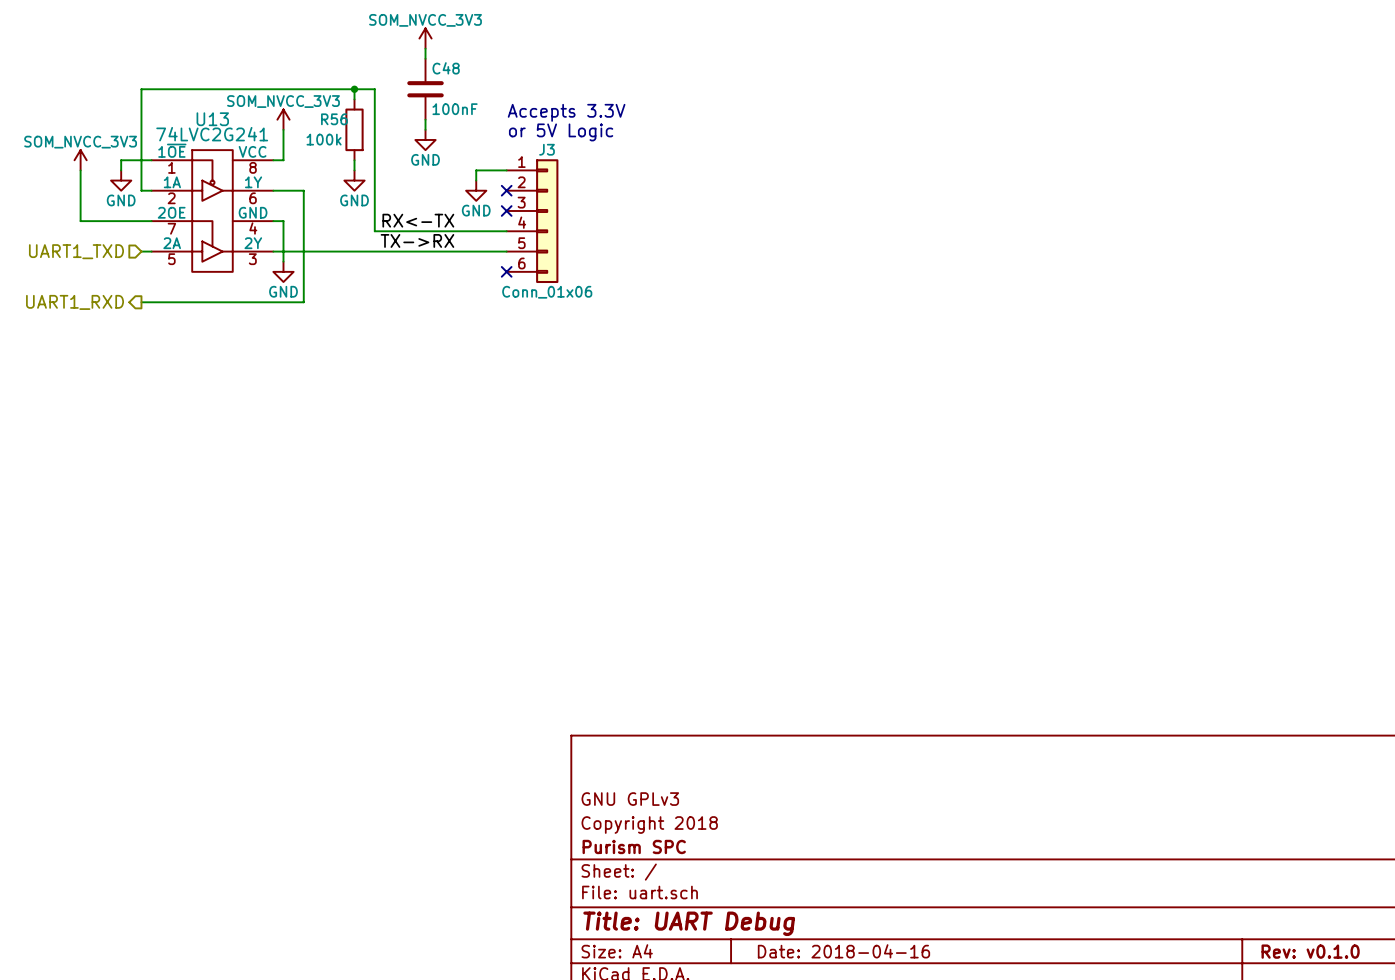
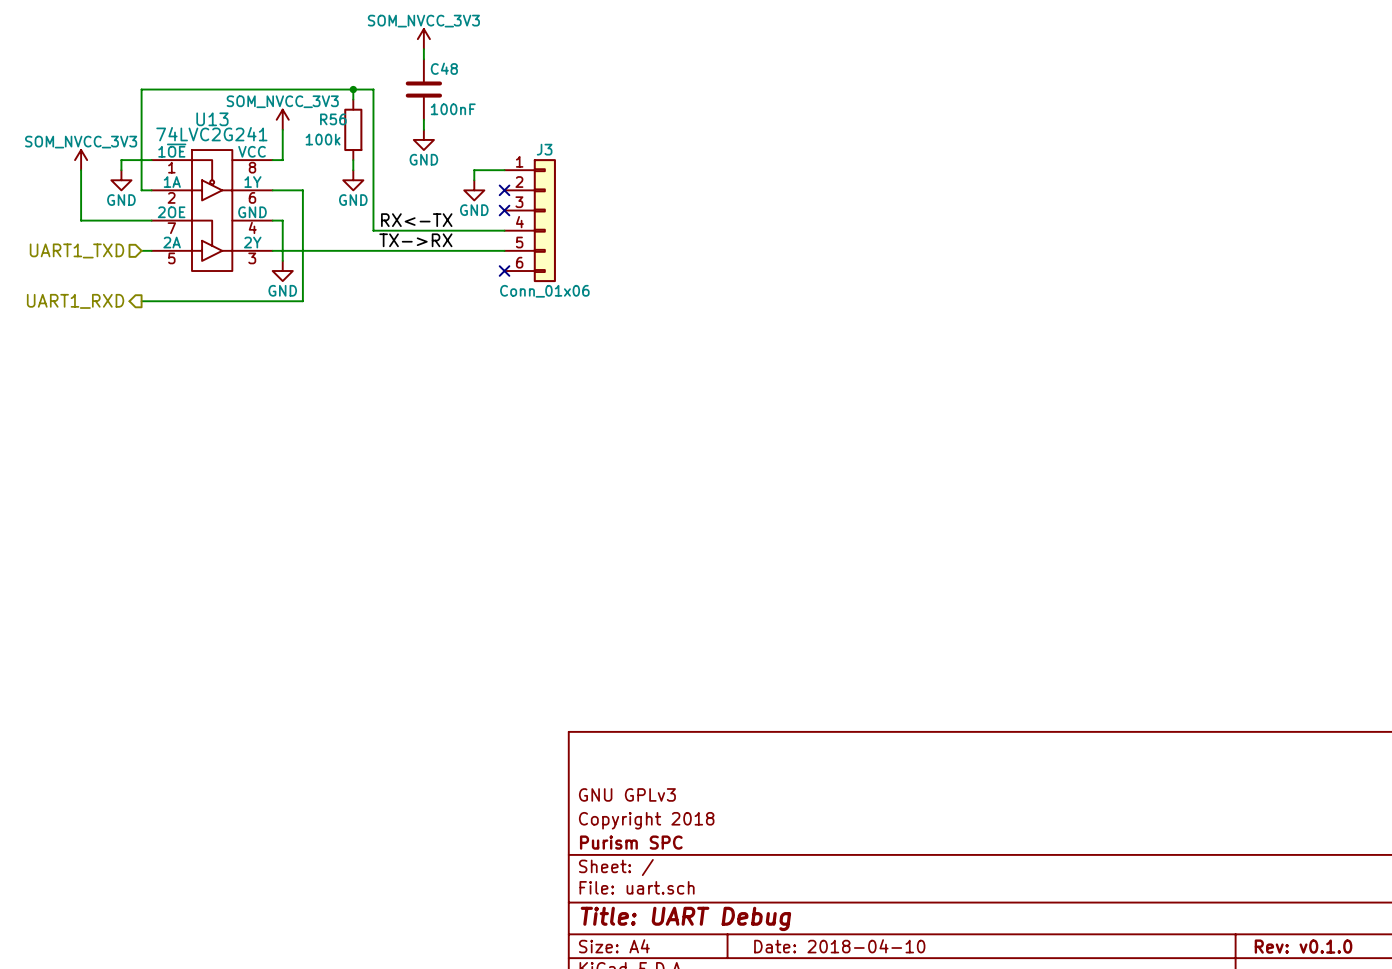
text: Accepts 3.3V (566, 112) -> none
text: or 5V Logic (561, 132) -> none
title block: Date: 2018-04-16 (843, 951) -> Date: 2018-04-10 (839, 946)

